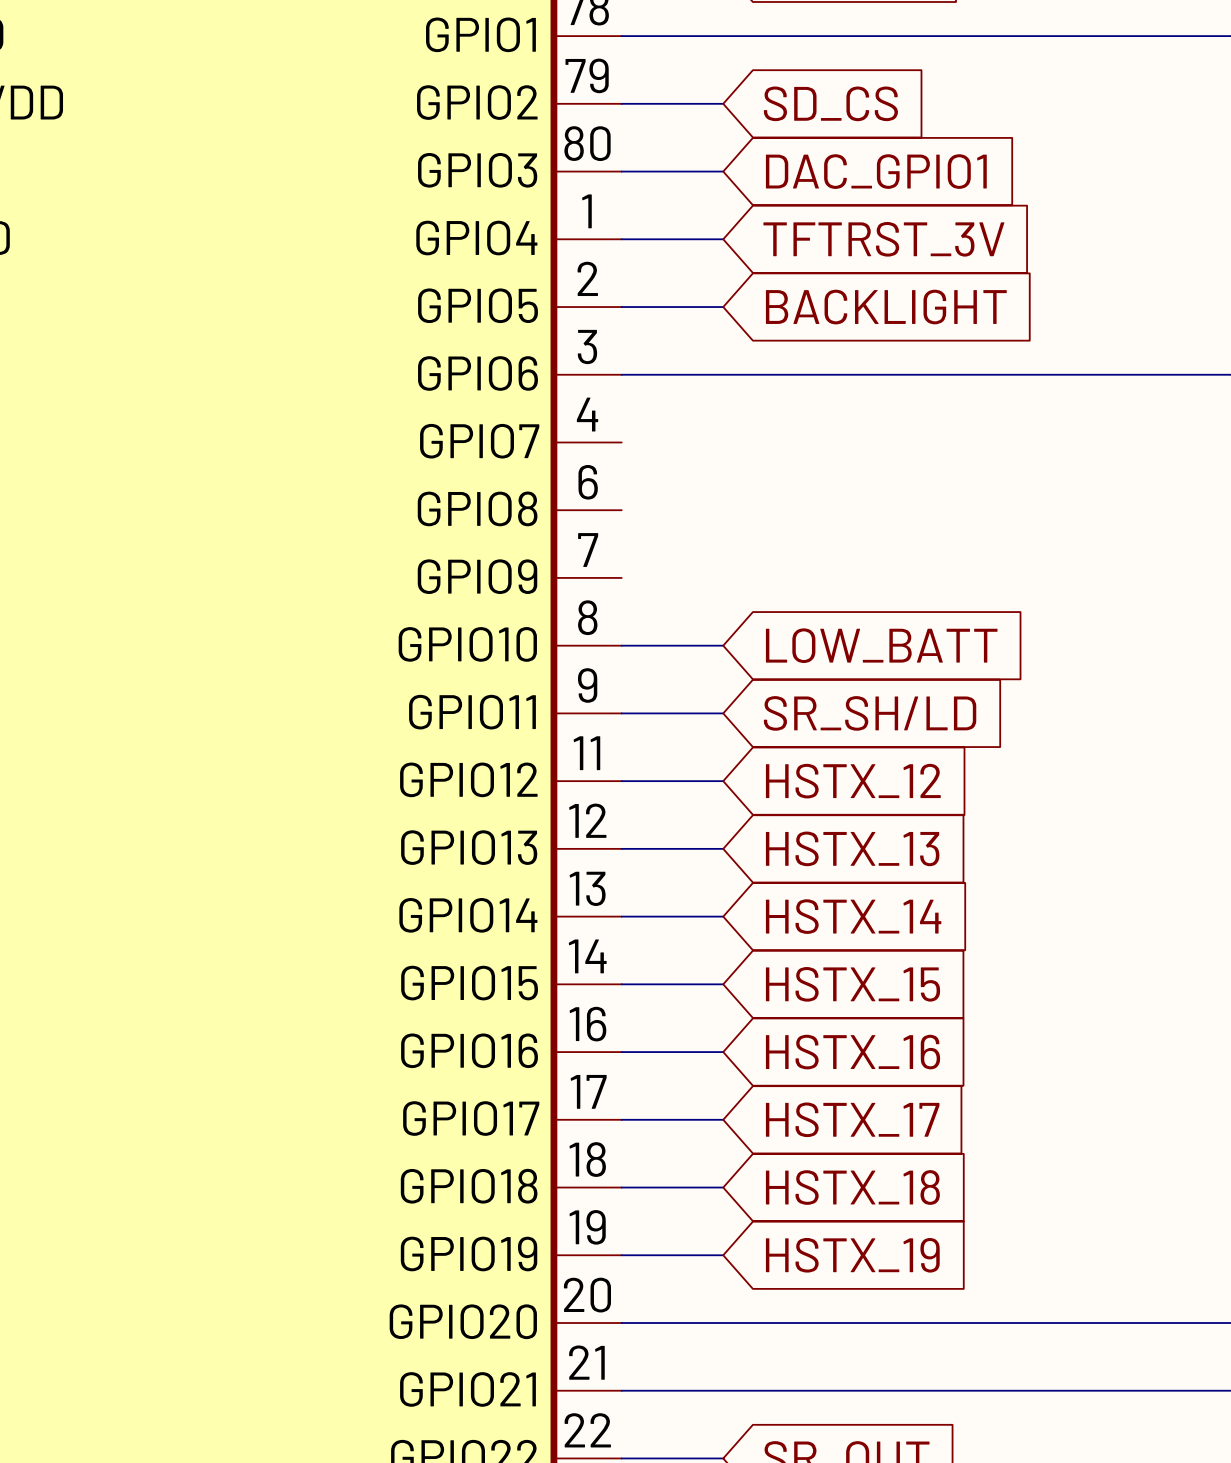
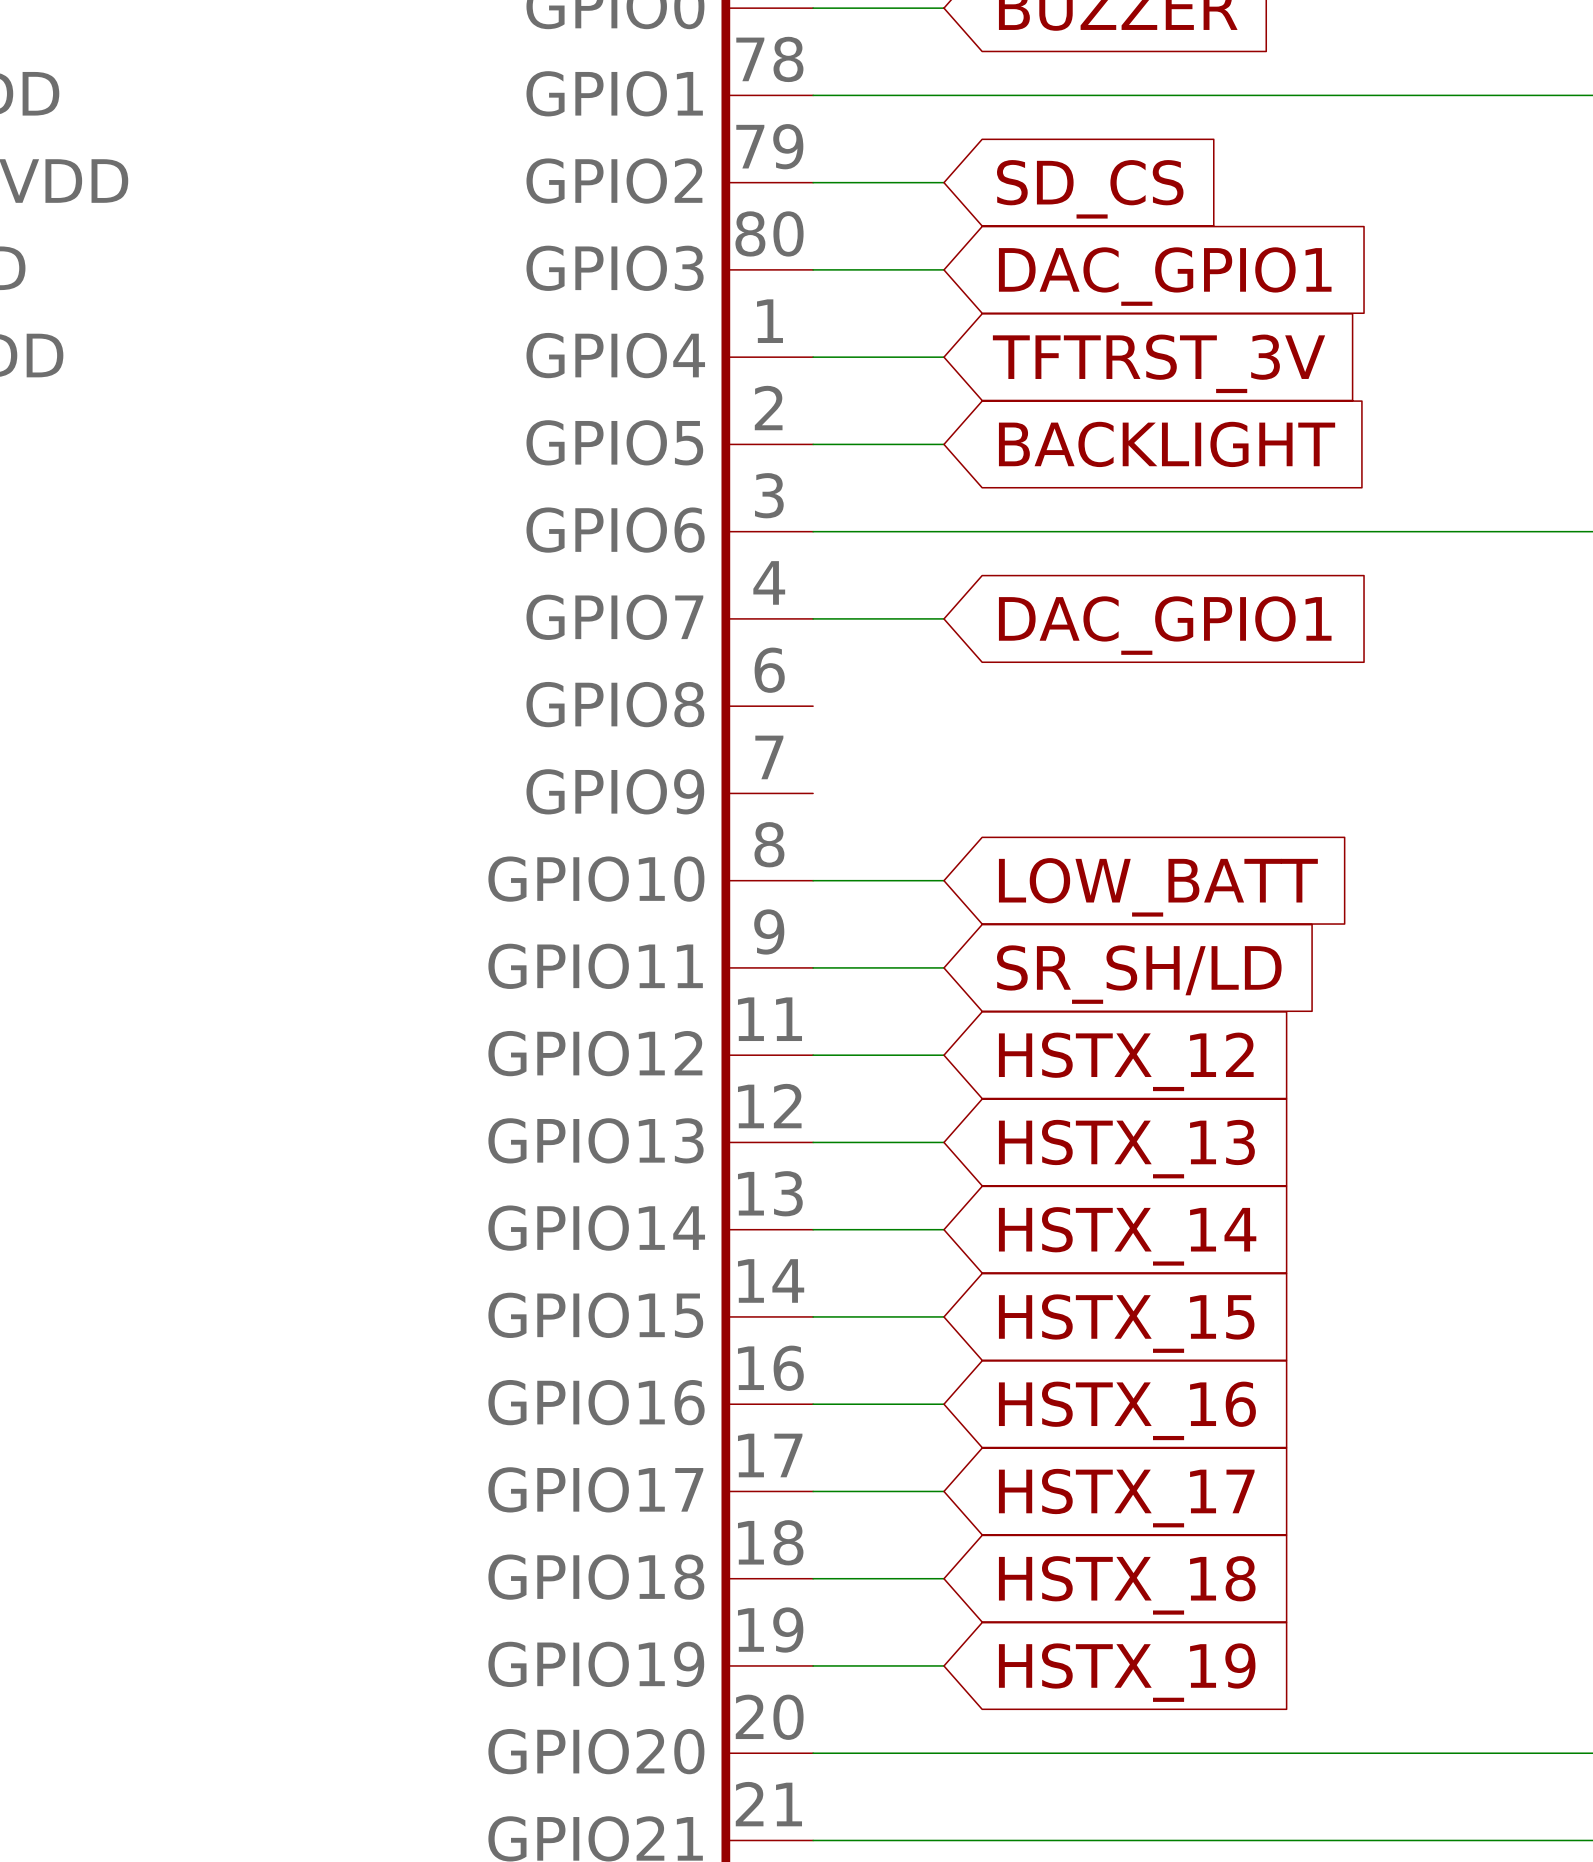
wire: none -> (813, 618) (943, 618)
global label: none -> DAC_GPIO1 (1165, 625)

